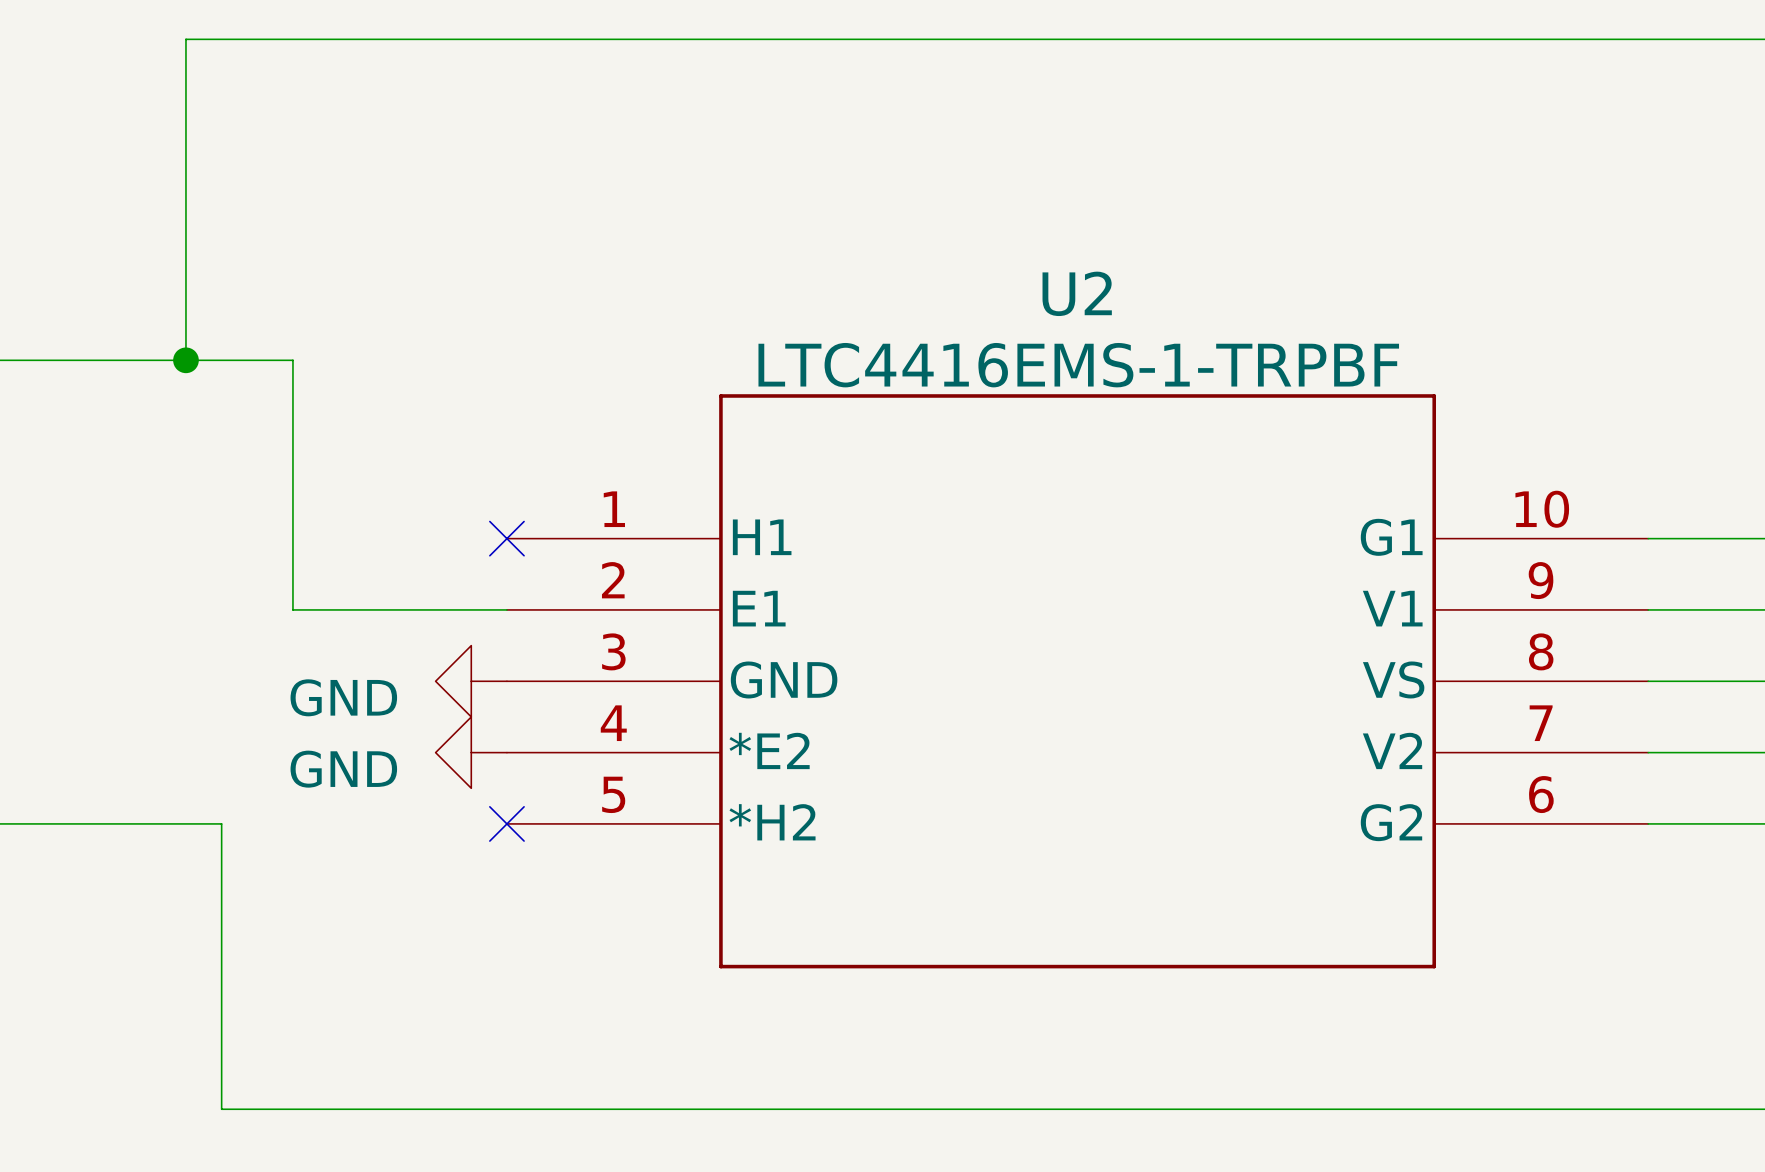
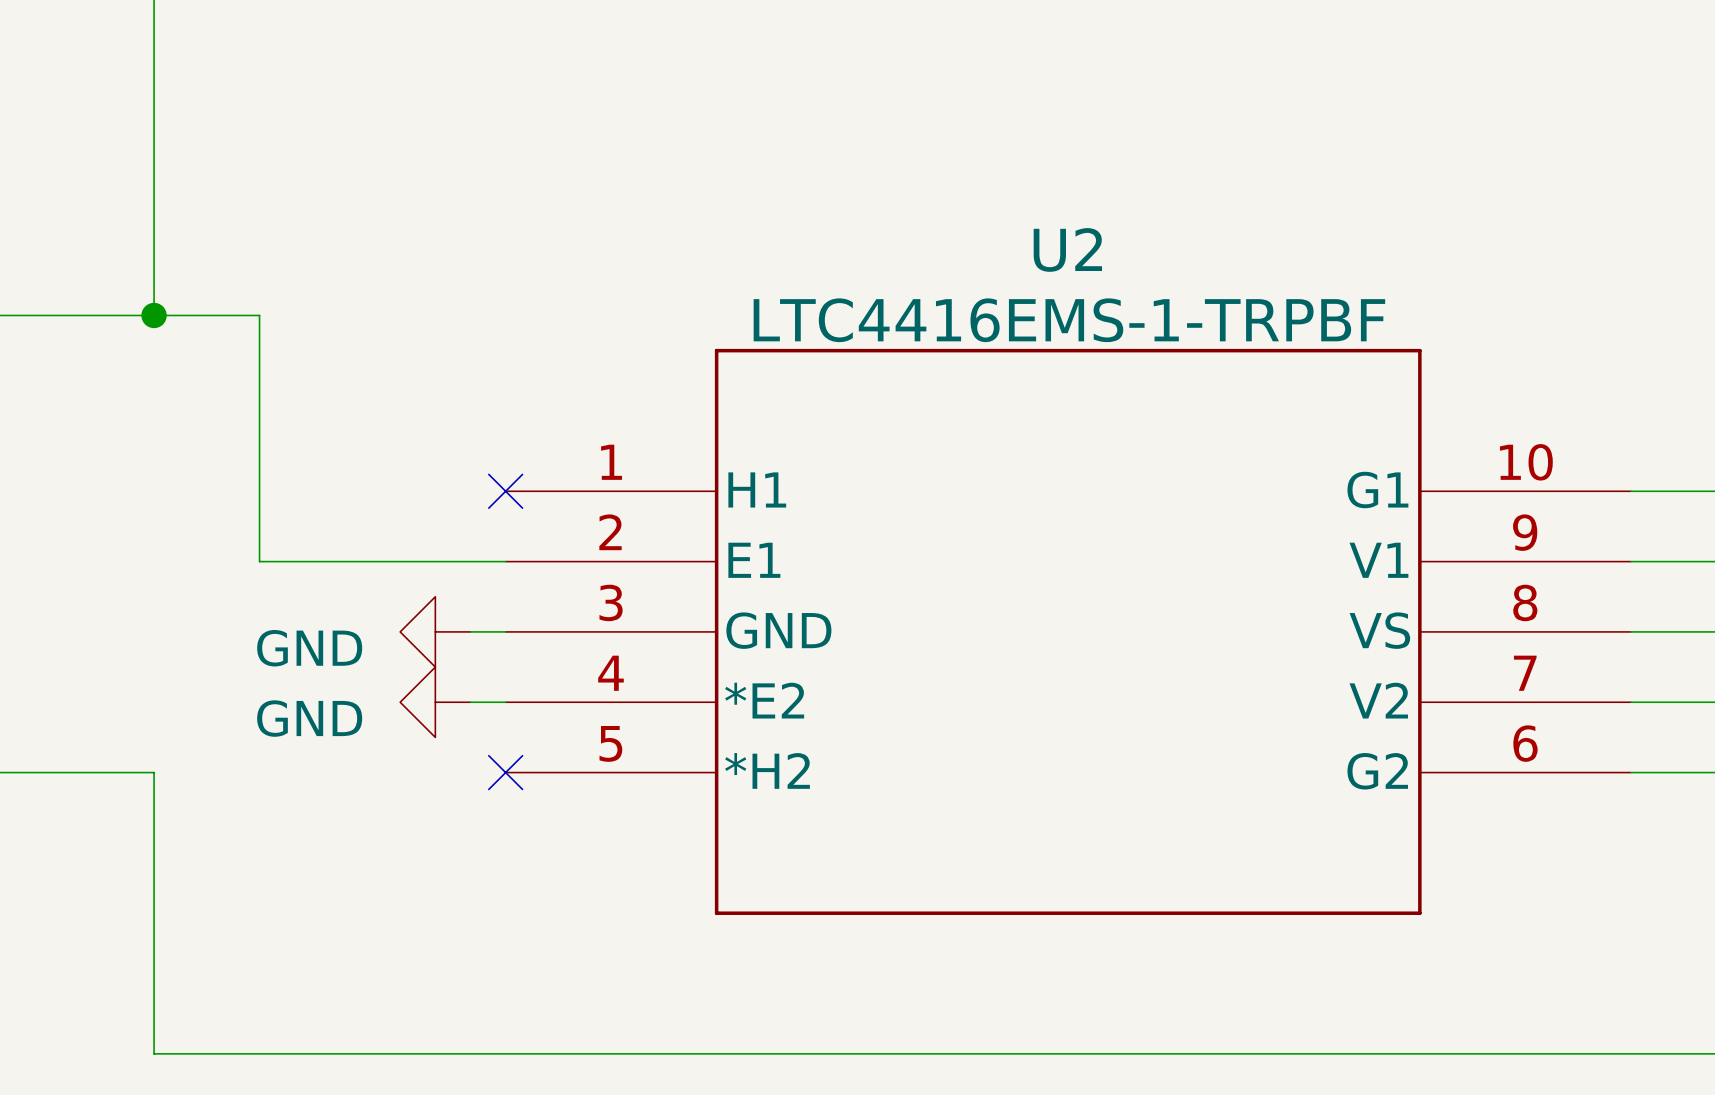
no-connect mark position: (506, 538) -> (505, 491)
U2 position: (1077, 681) -> (1068, 631)
wire: (185, 823) (221, 823) (221, 1109) -> (154, 772) (154, 1053) (189, 1053)
no-connect mark position: (506, 823) -> (505, 772)

